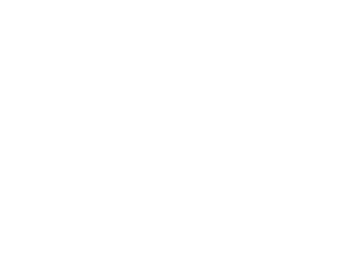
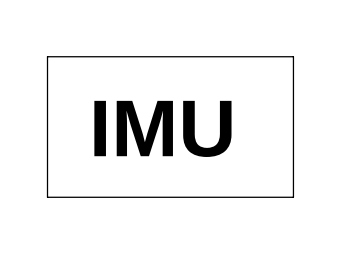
line: none -> (47, 56) (293, 56) (293, 197) (47, 197) (47, 56)
text: none -> IMU (162, 128)

